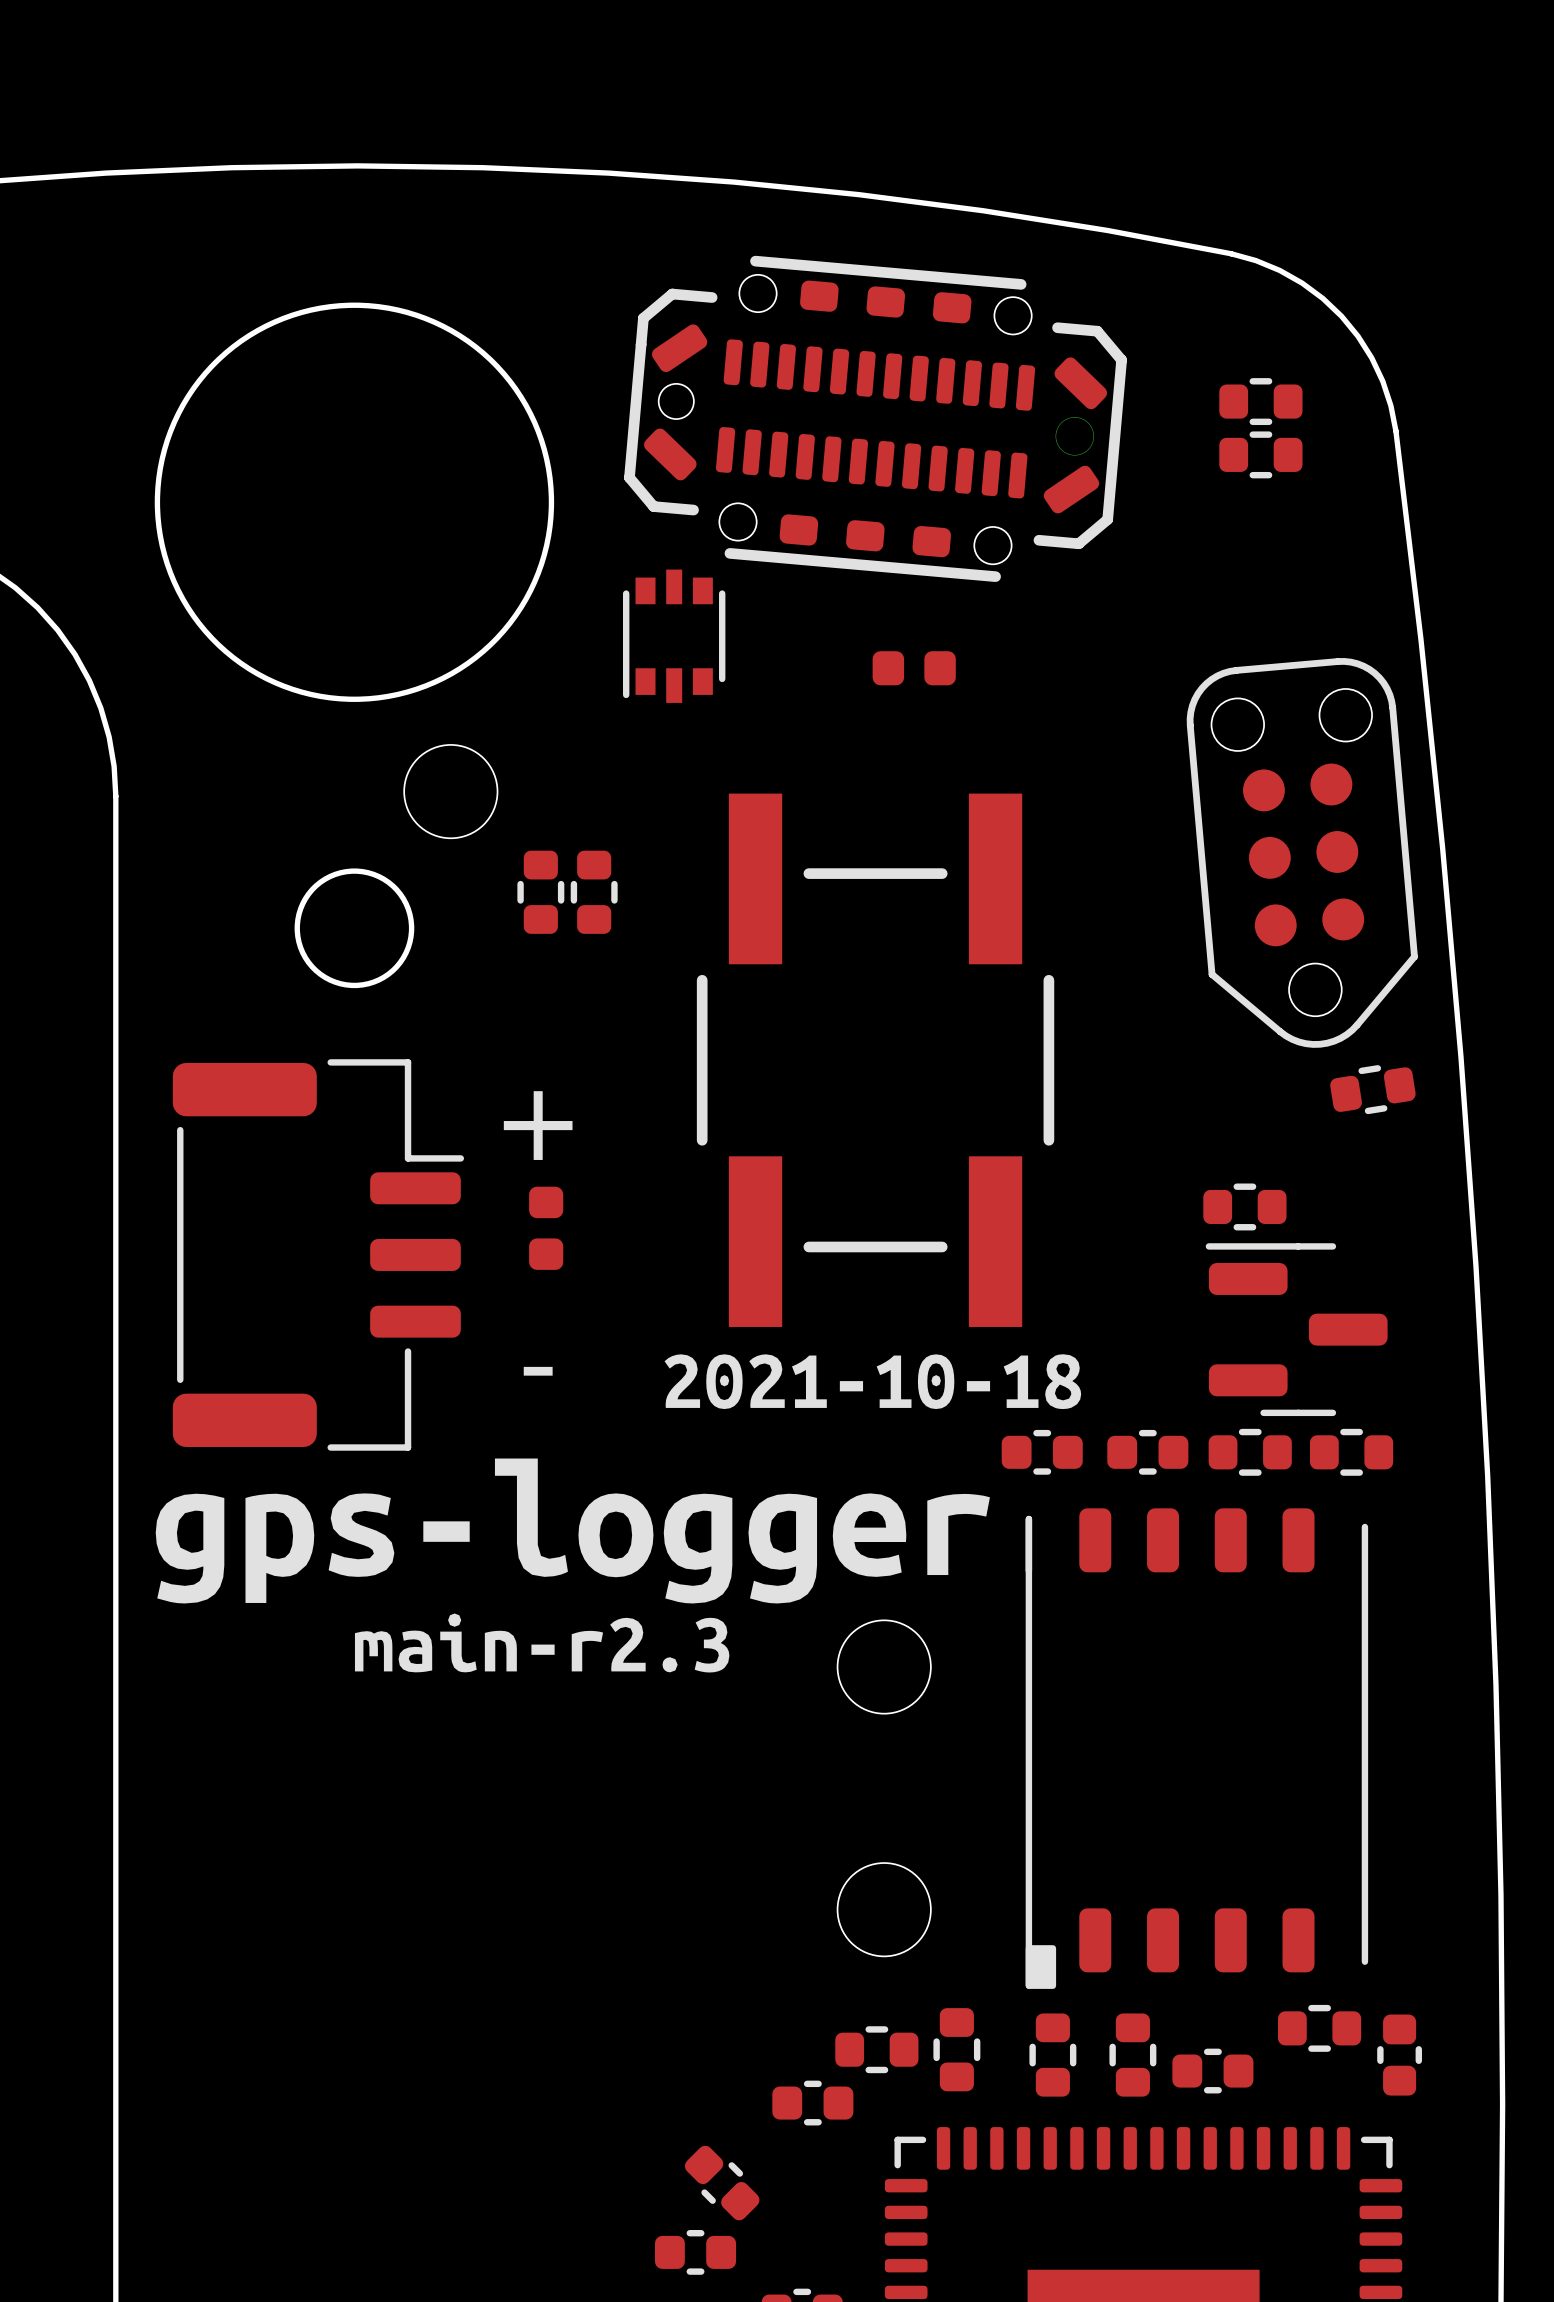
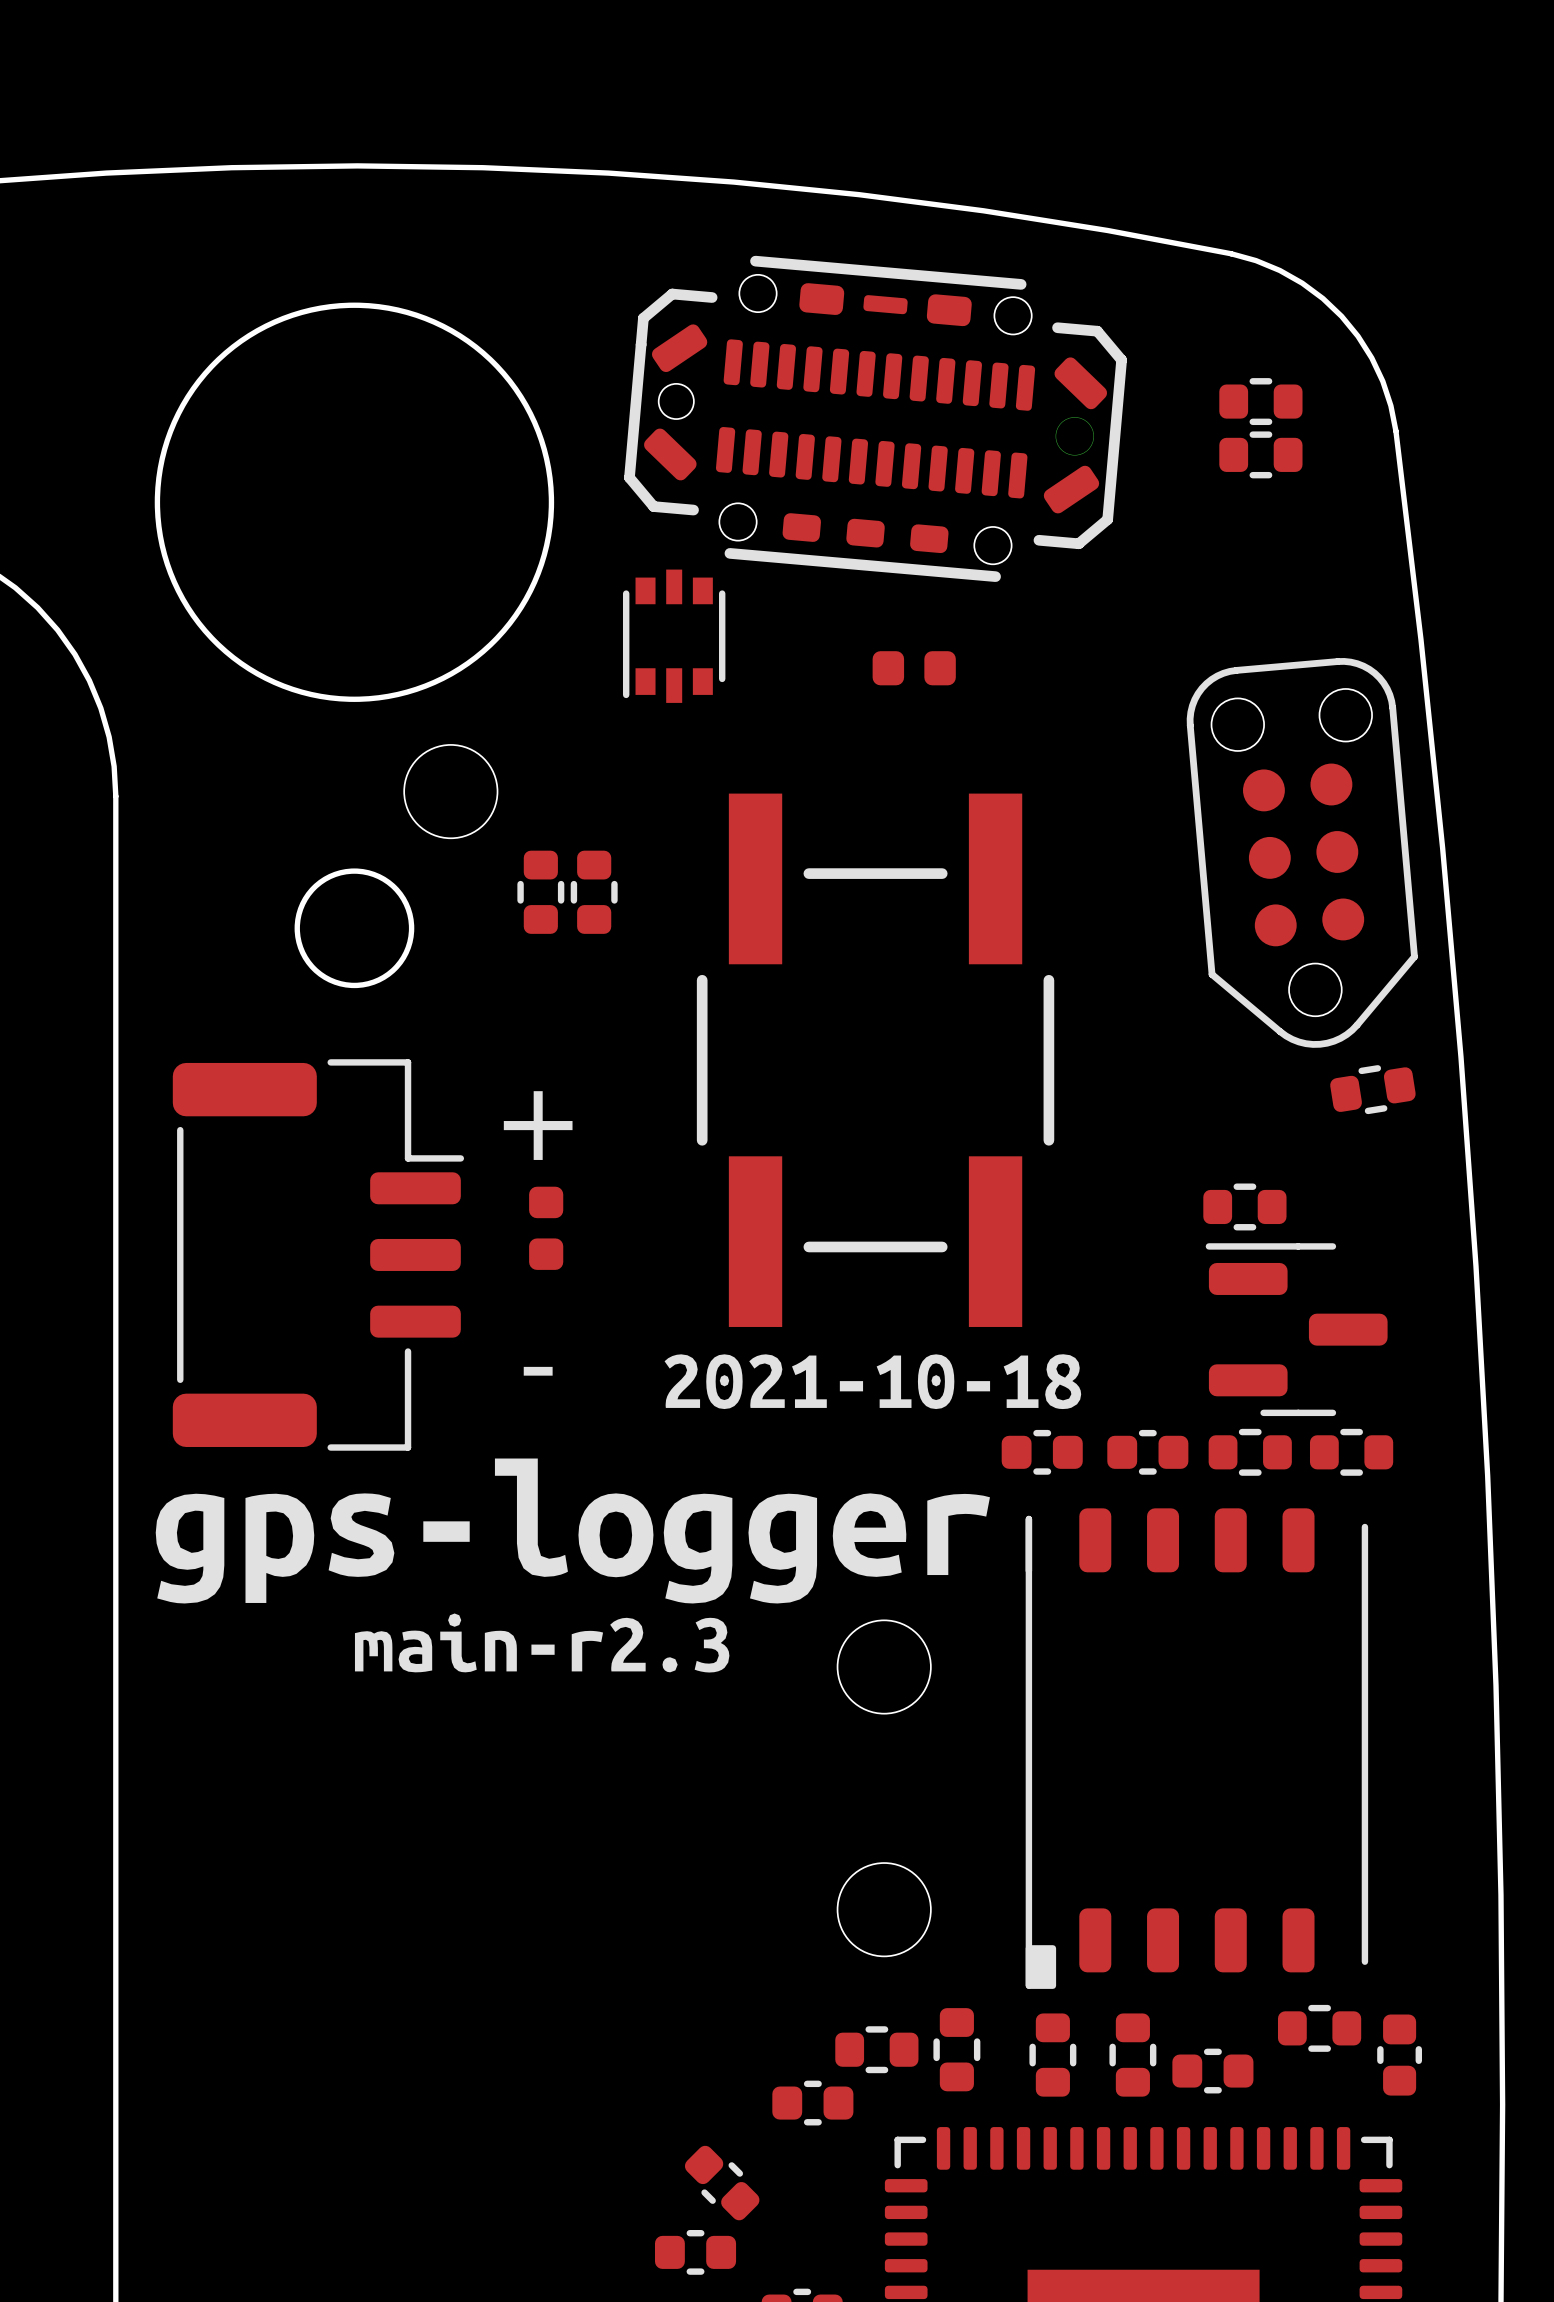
part footprint: [624, 255, 1127, 582] -> [624, 255, 1127, 582]

